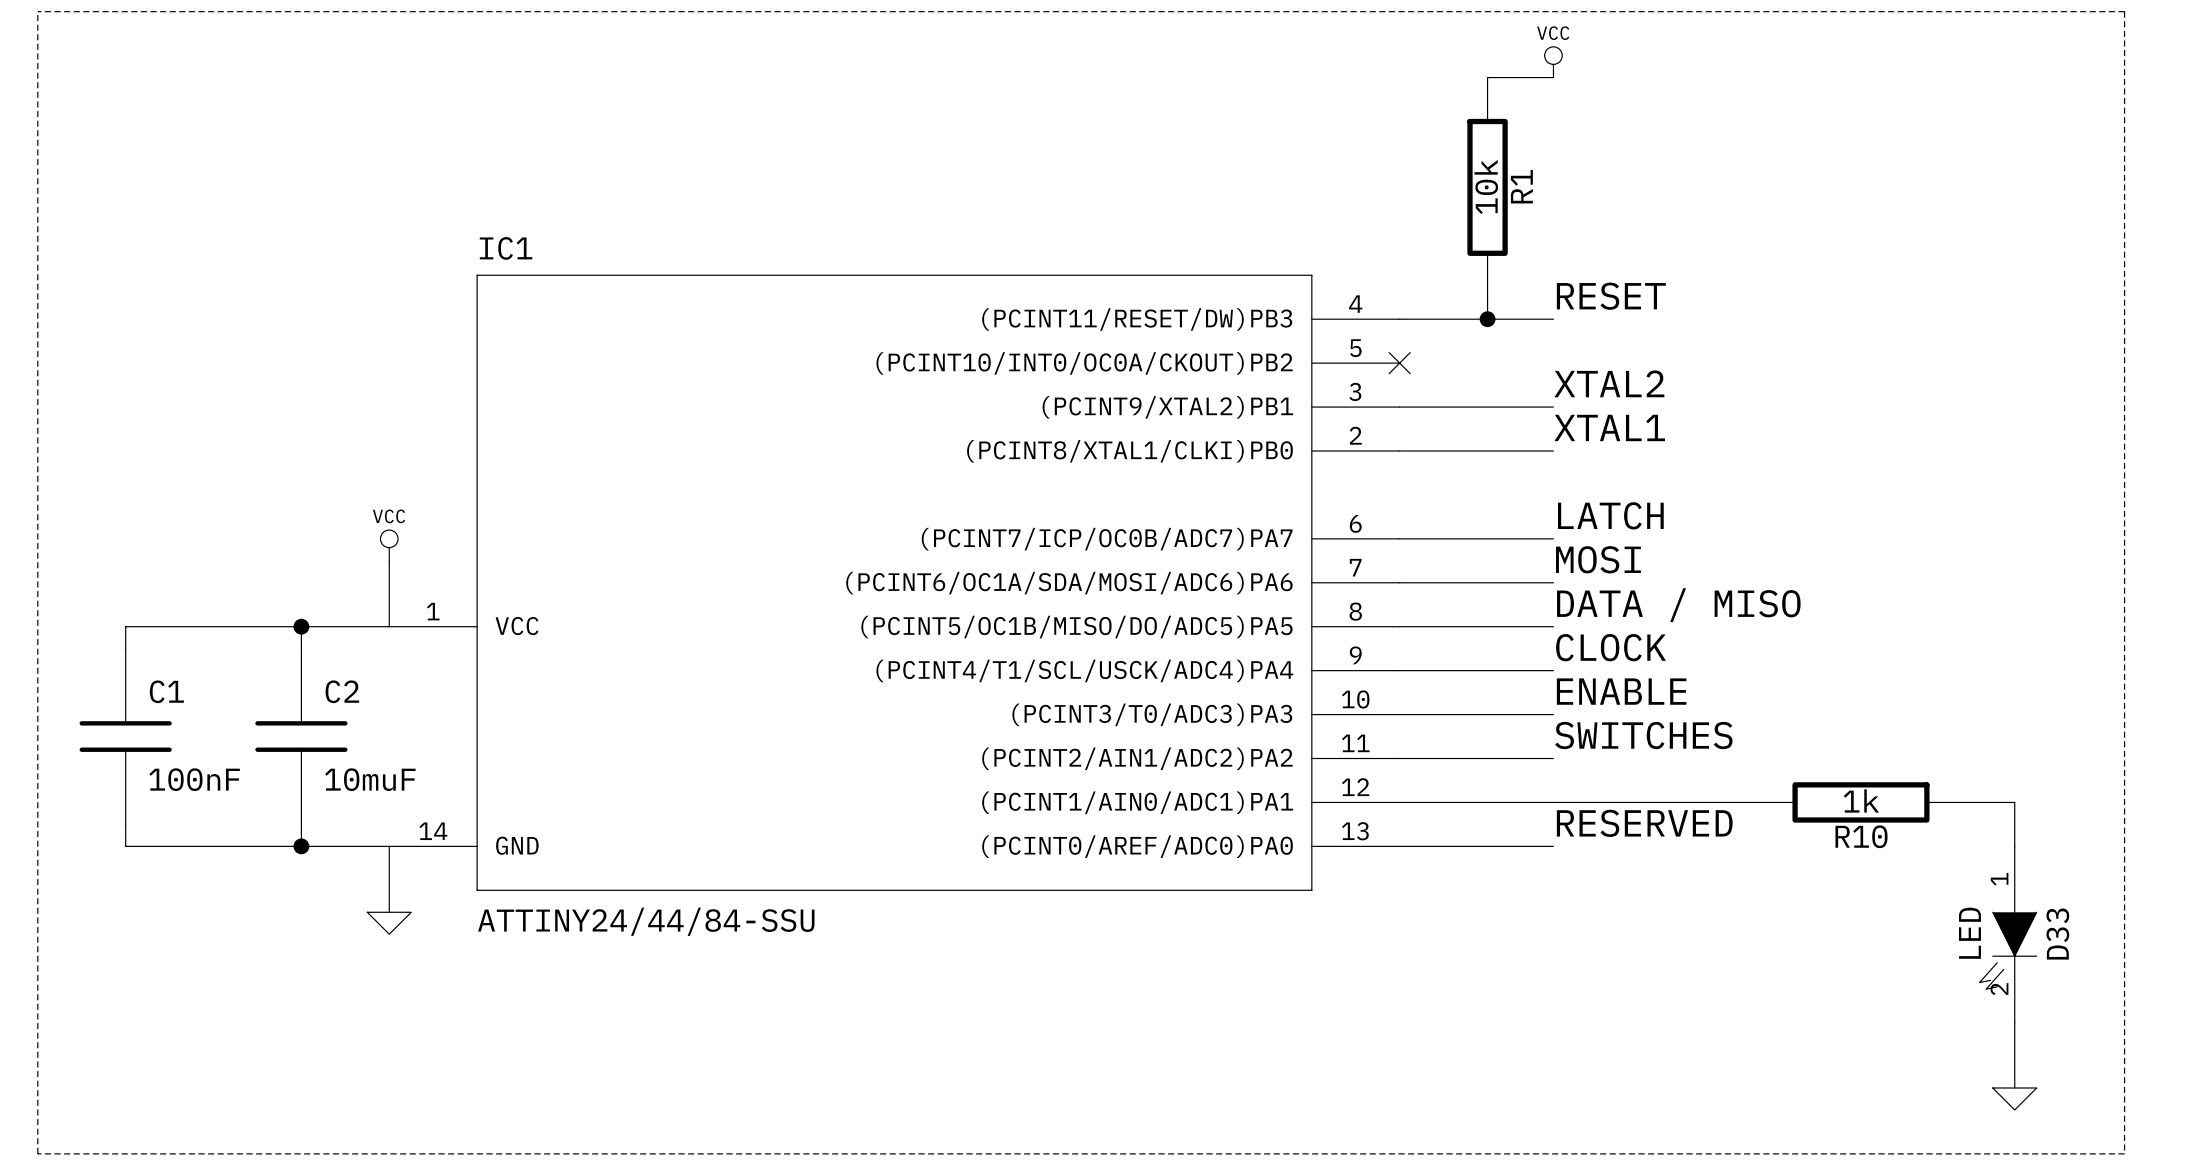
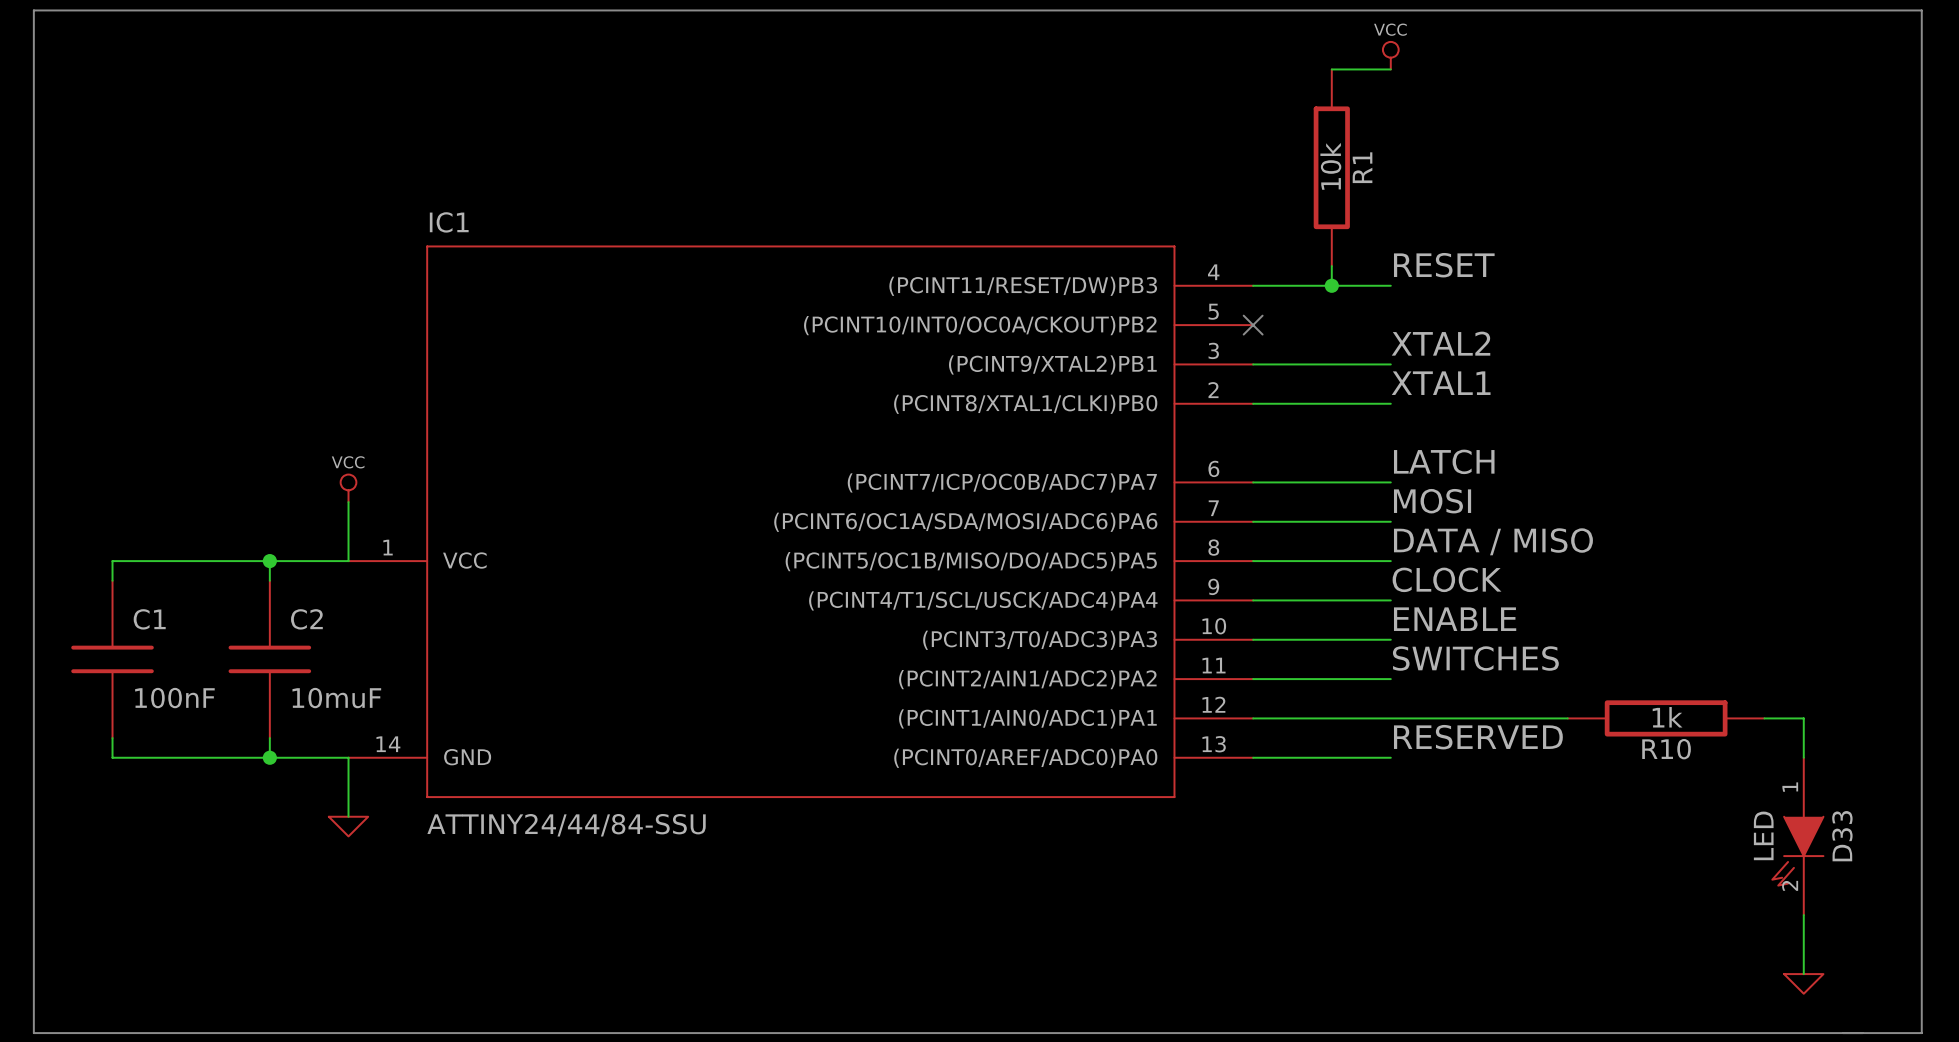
line: (37, 11) (2124, 11) (2124, 1153) (37, 1153) (37, 11) -> none
bus: none -> (33, 10) (1921, 10) (1921, 1033) (33, 1033) (33, 10)

